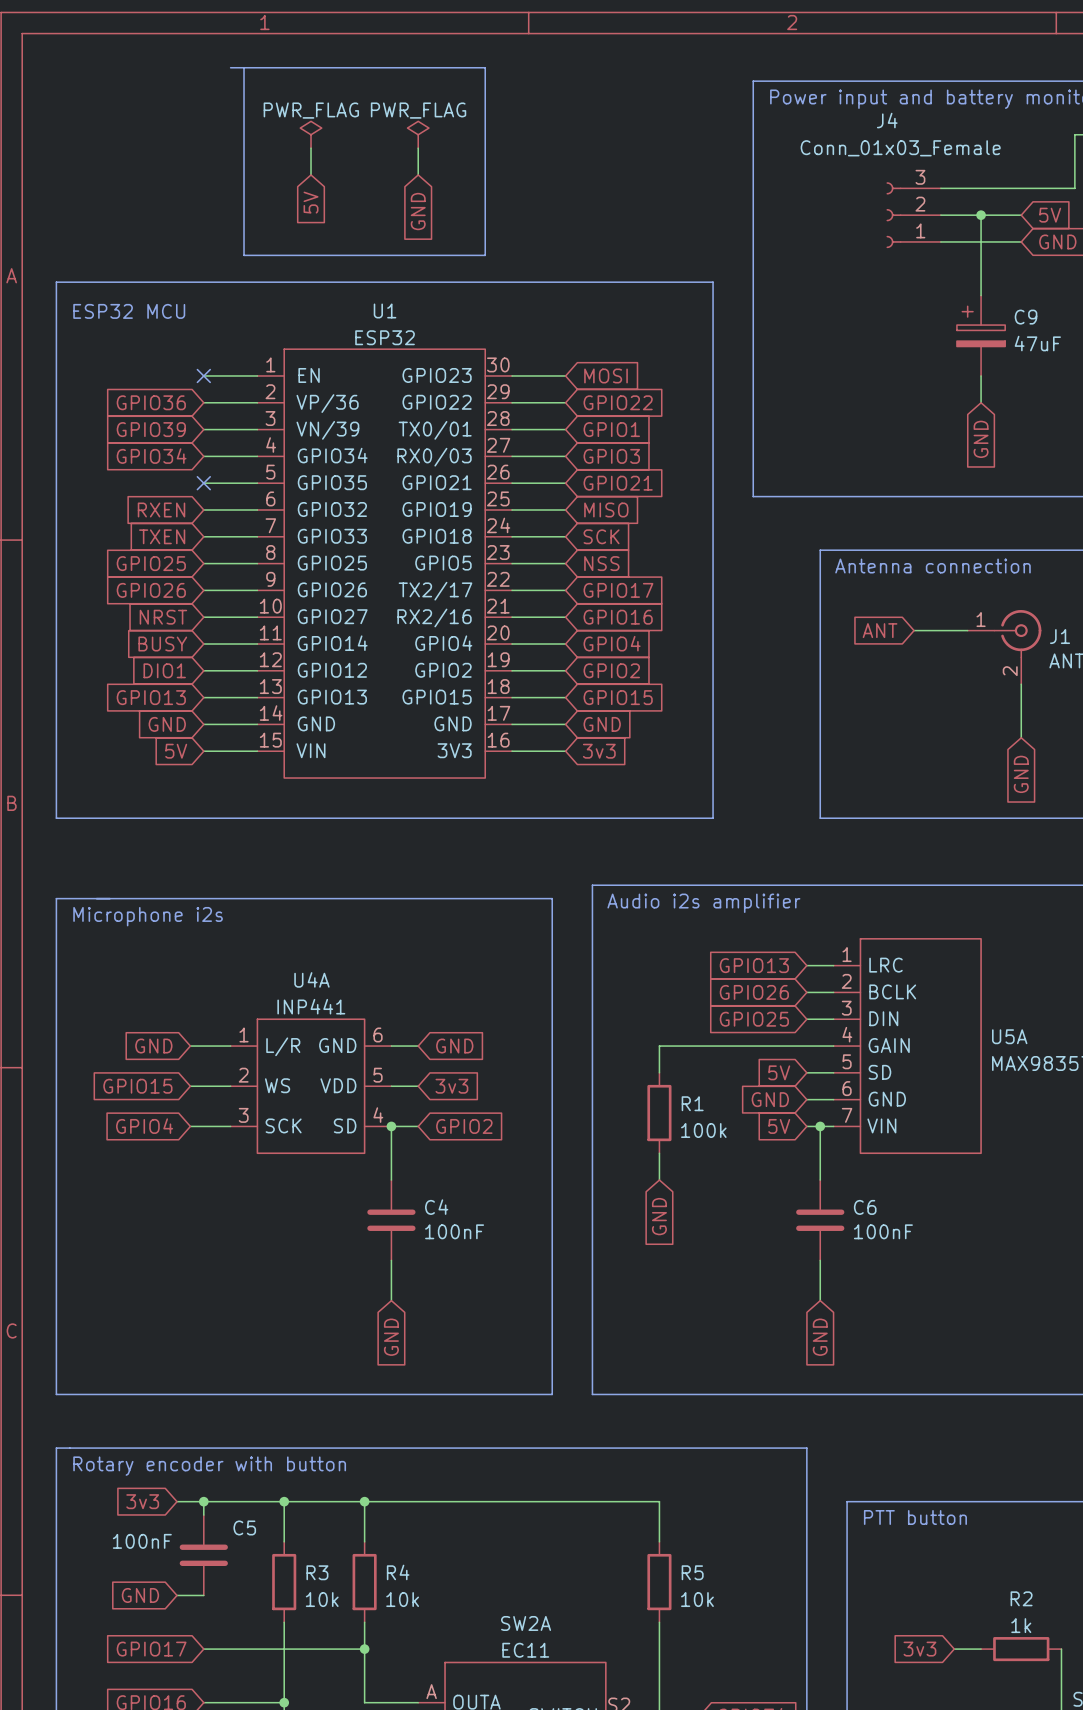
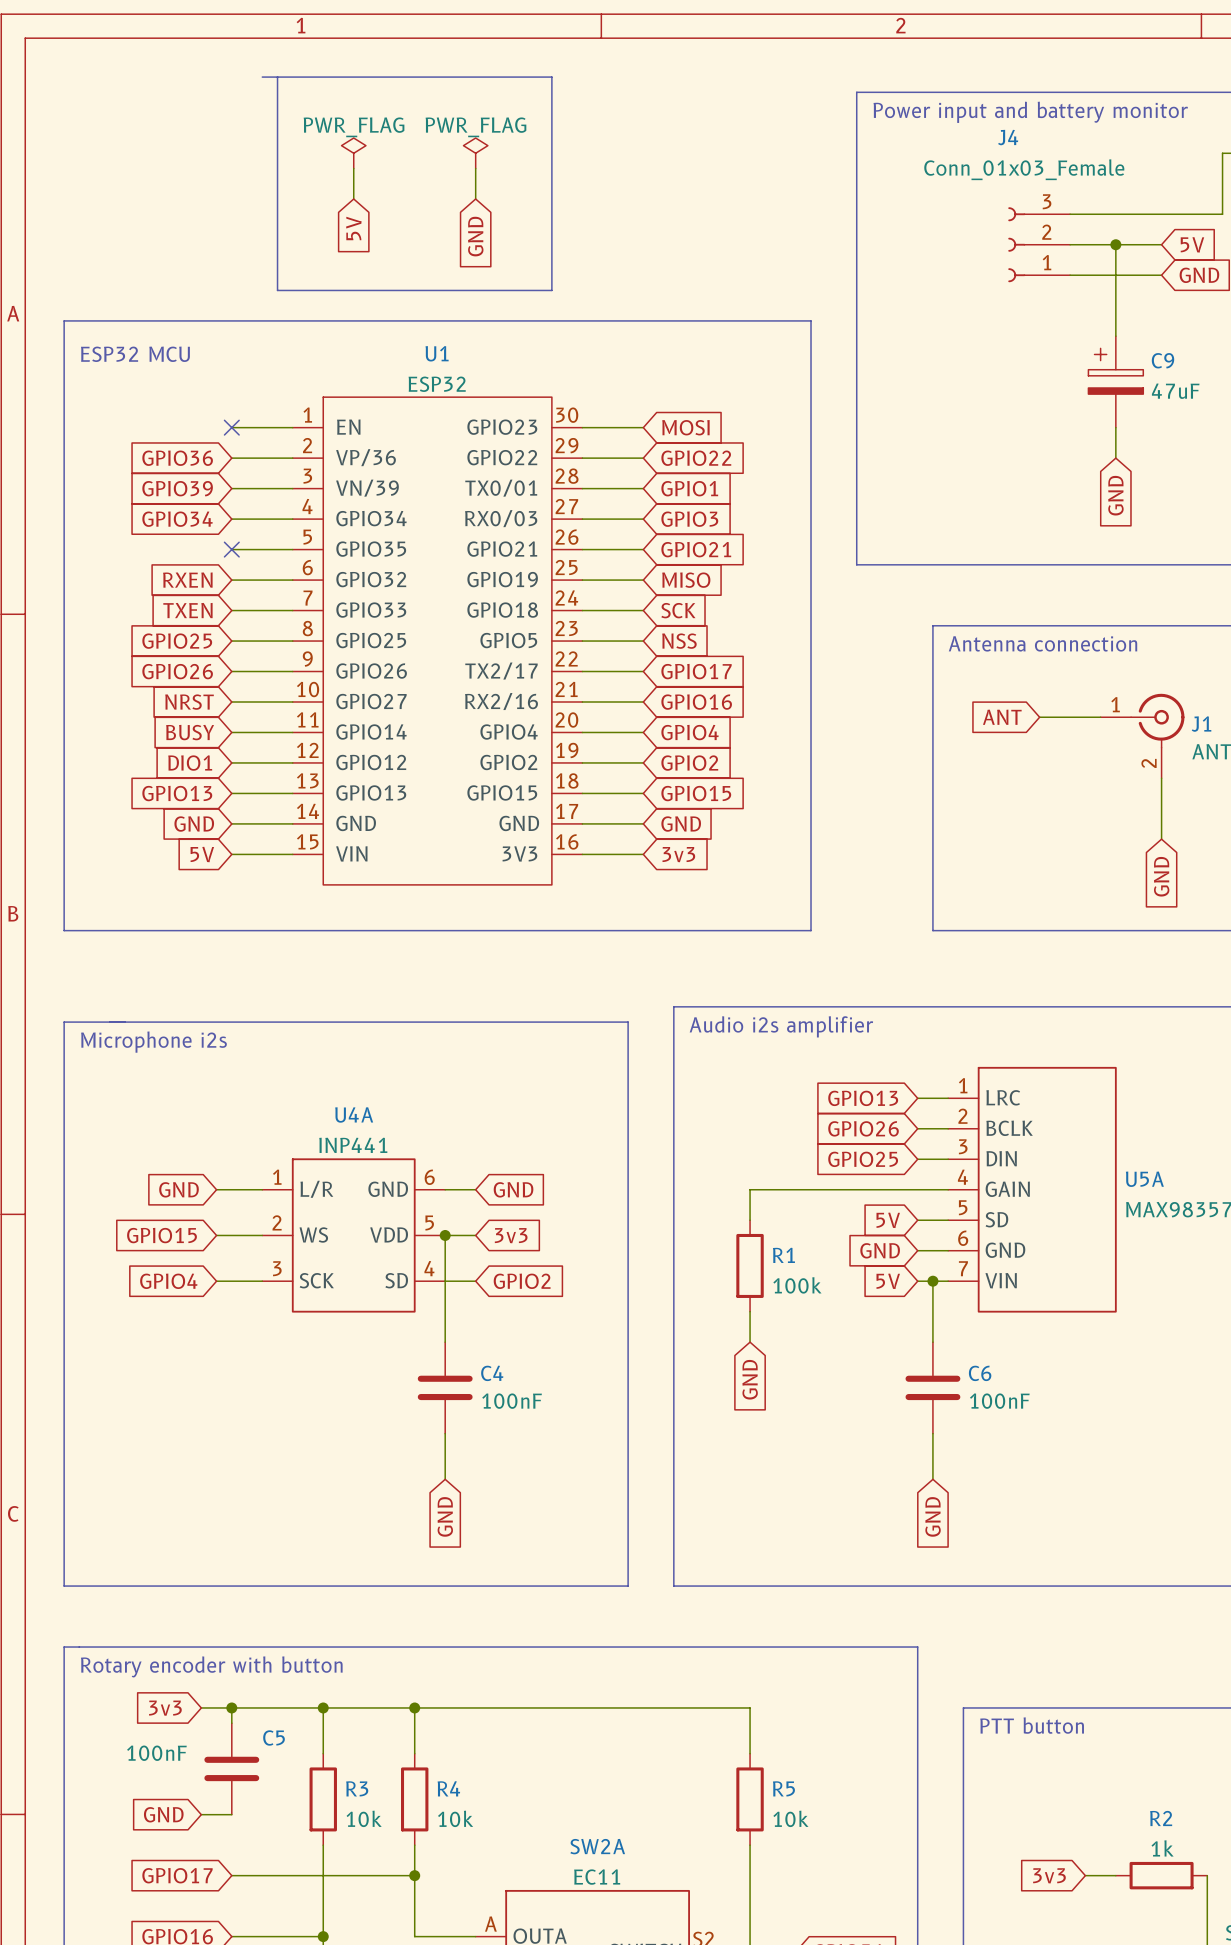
wire: none -> (445, 1235) (445, 1281)
junction position: (391, 1126) -> (445, 1235)

